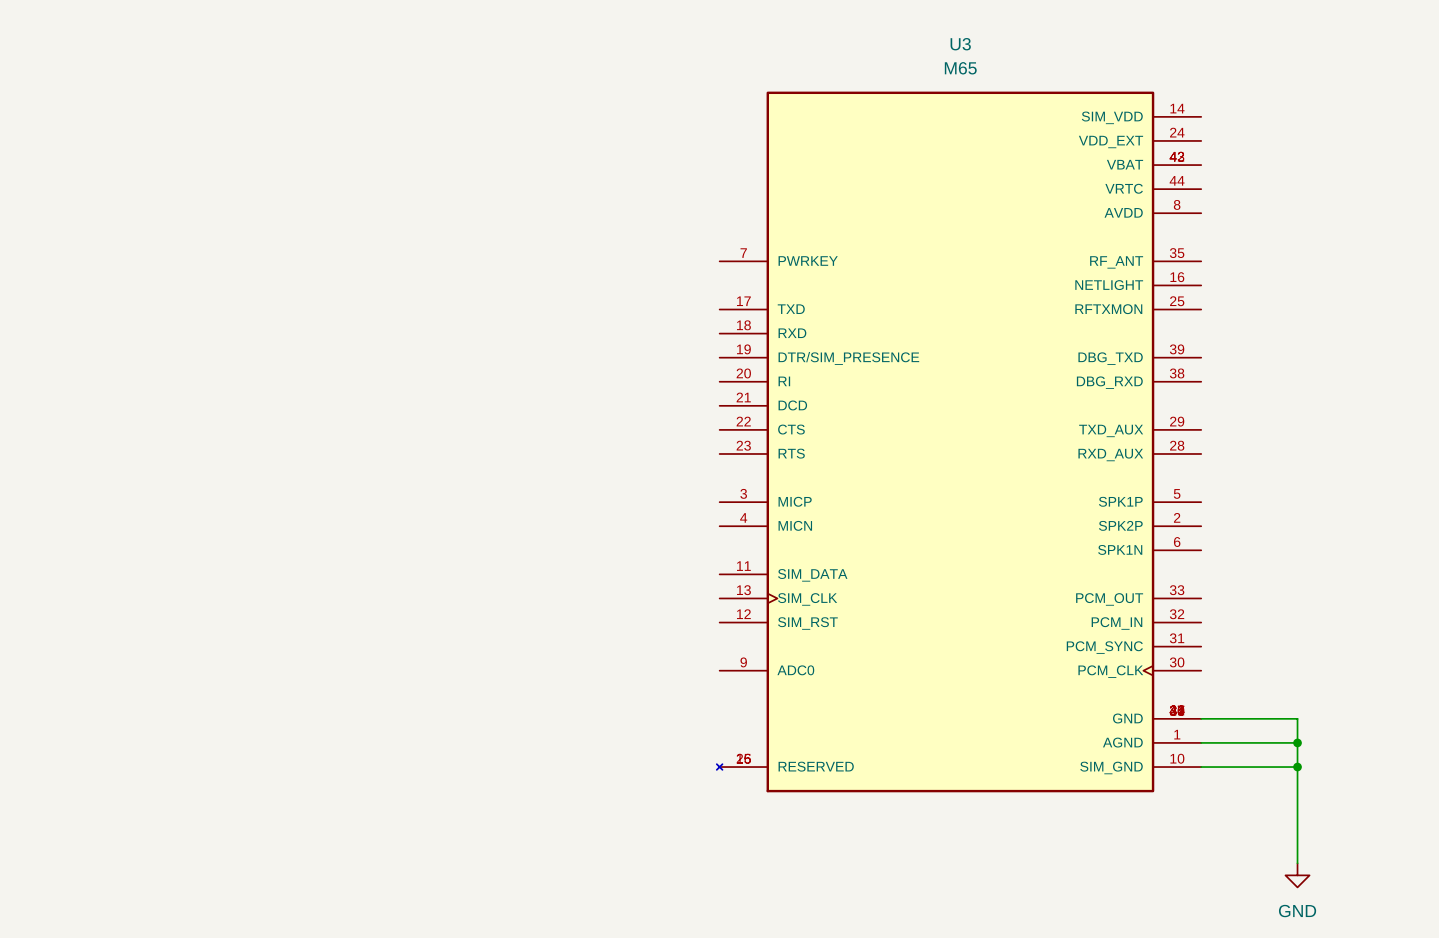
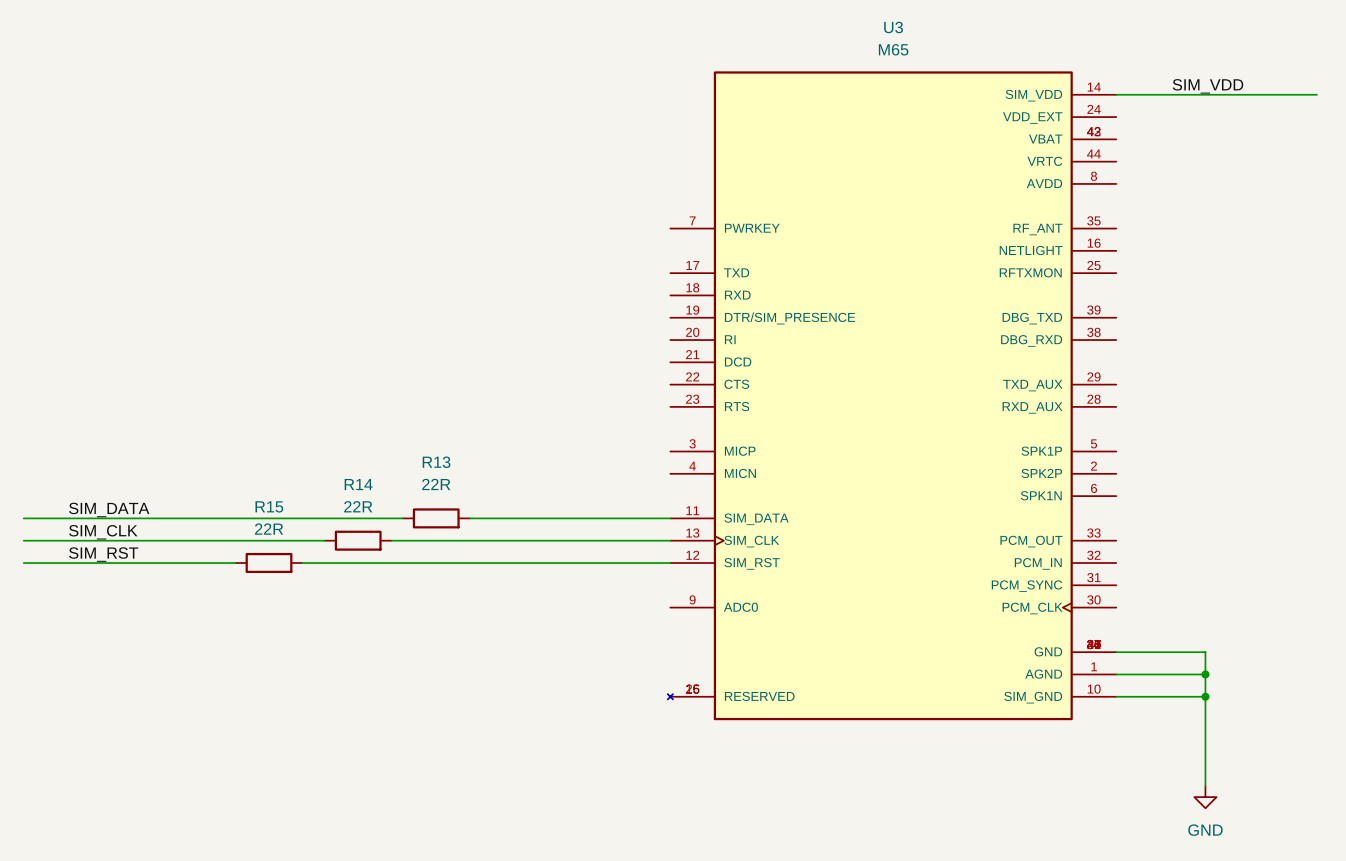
label: none -> SIM_VDD (1208, 86)
wire: none -> (1116, 94) (1316, 94)
label: none -> SIM_DATA (109, 509)
wire: none -> (23, 518) (402, 518)
R13: none -> 22R (436, 518)
wire: none -> (469, 518) (670, 518)
label: none -> SIM_CLK (103, 532)
wire: none -> (23, 540) (324, 540)
R14: none -> 22R (358, 540)
wire: none -> (391, 540) (670, 540)
label: none -> SIM_RST (103, 554)
wire: none -> (23, 562) (235, 562)
R15: none -> 22R (269, 562)
wire: none -> (302, 562) (670, 562)

